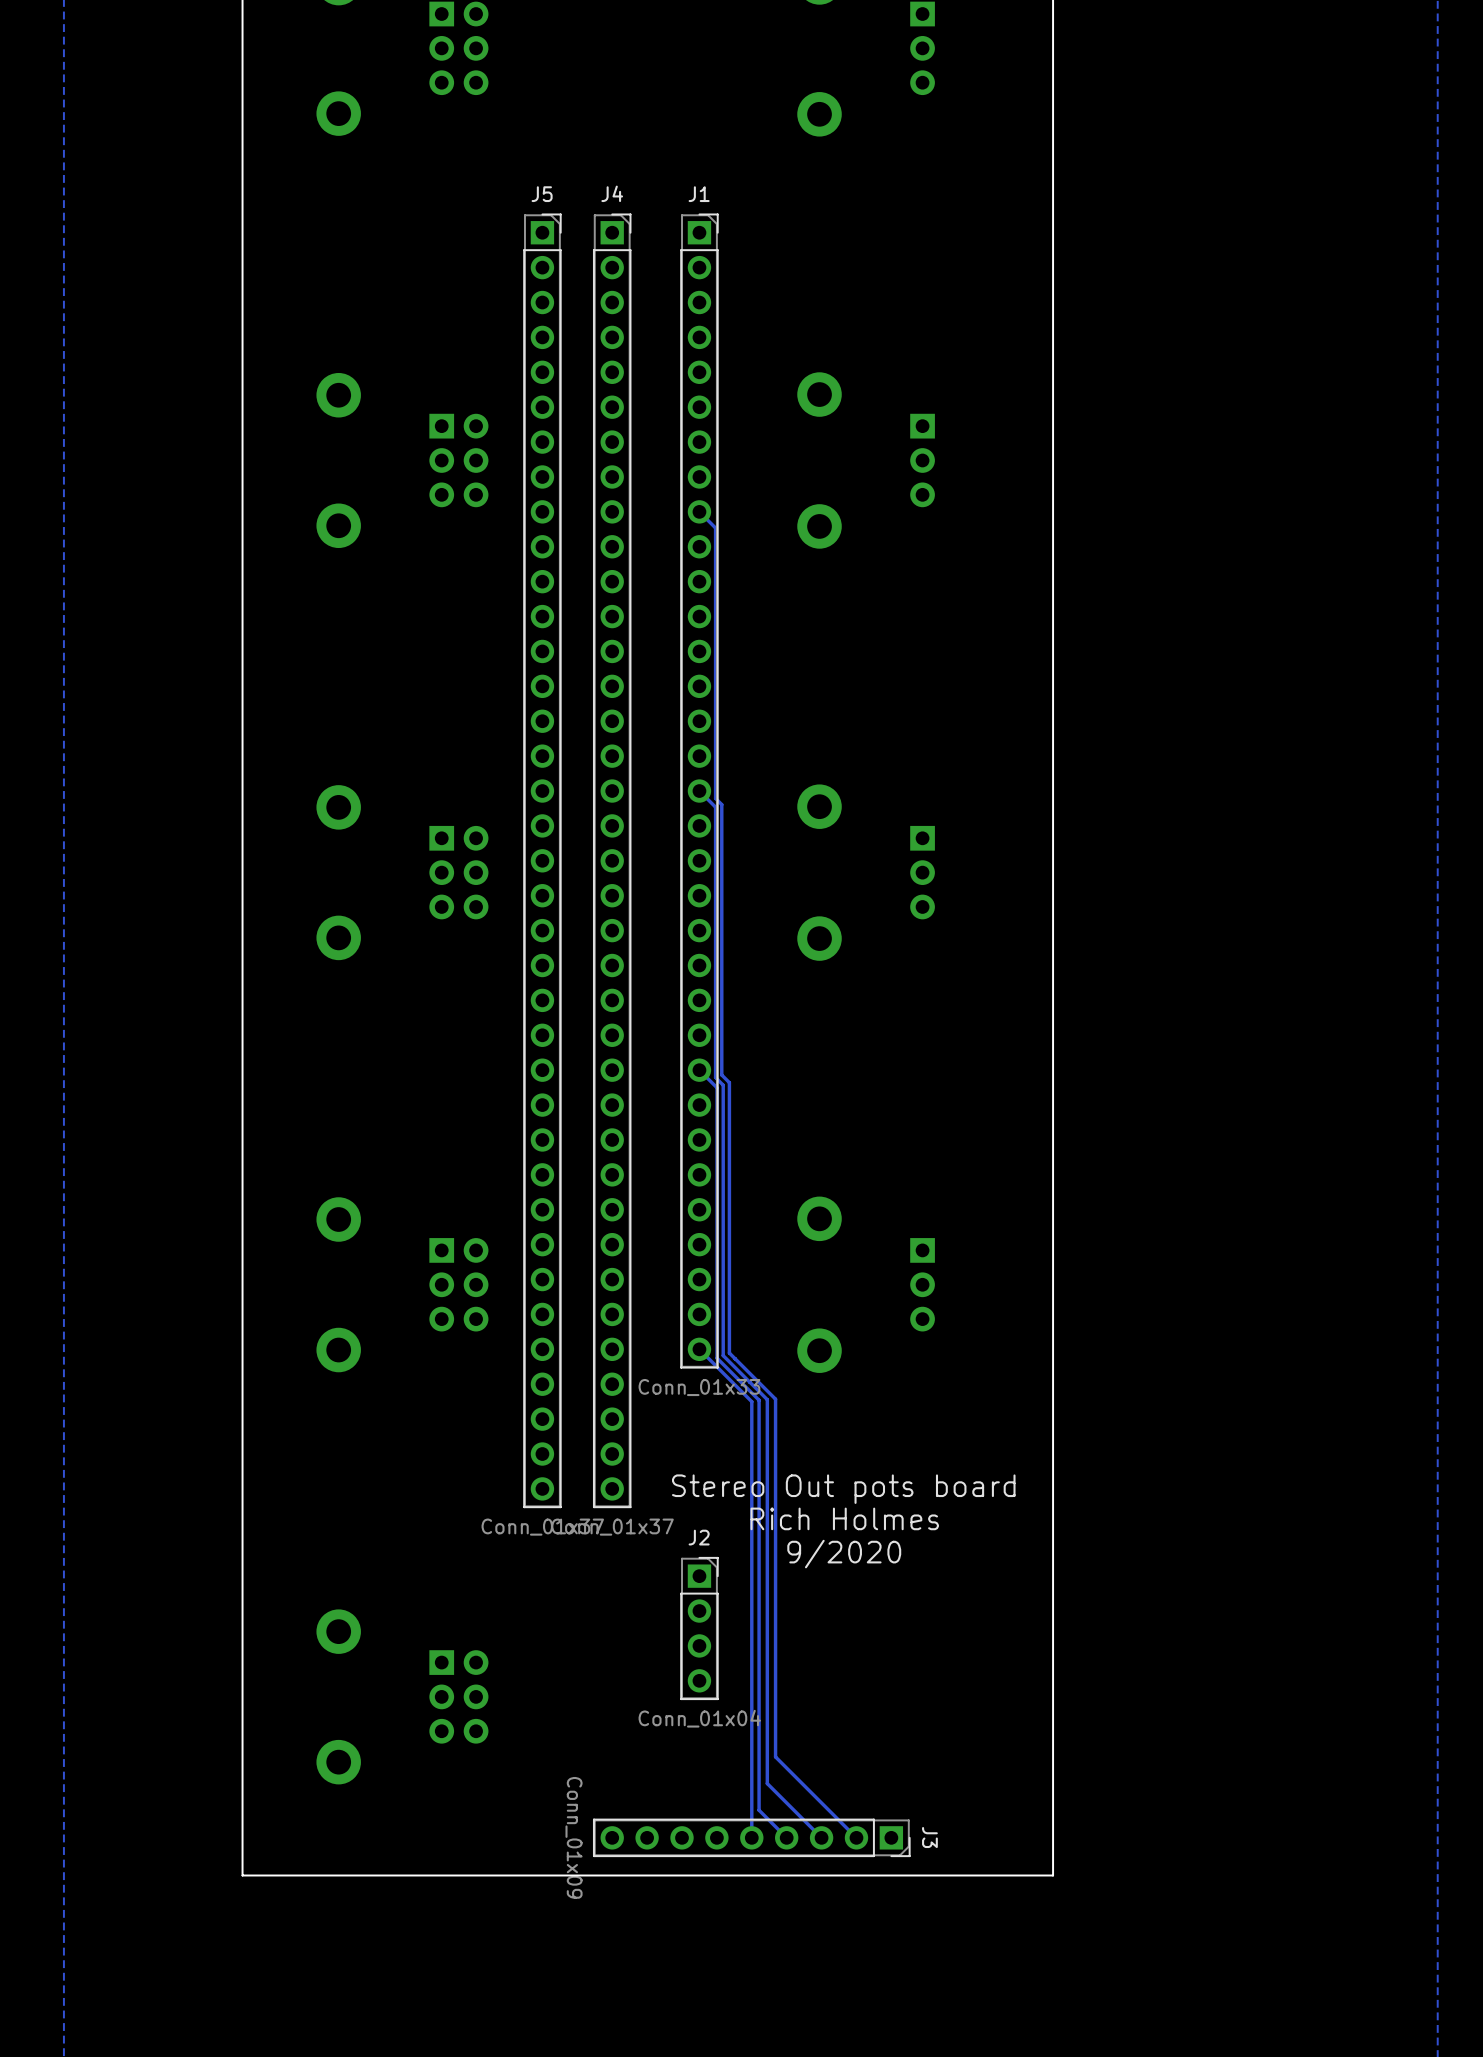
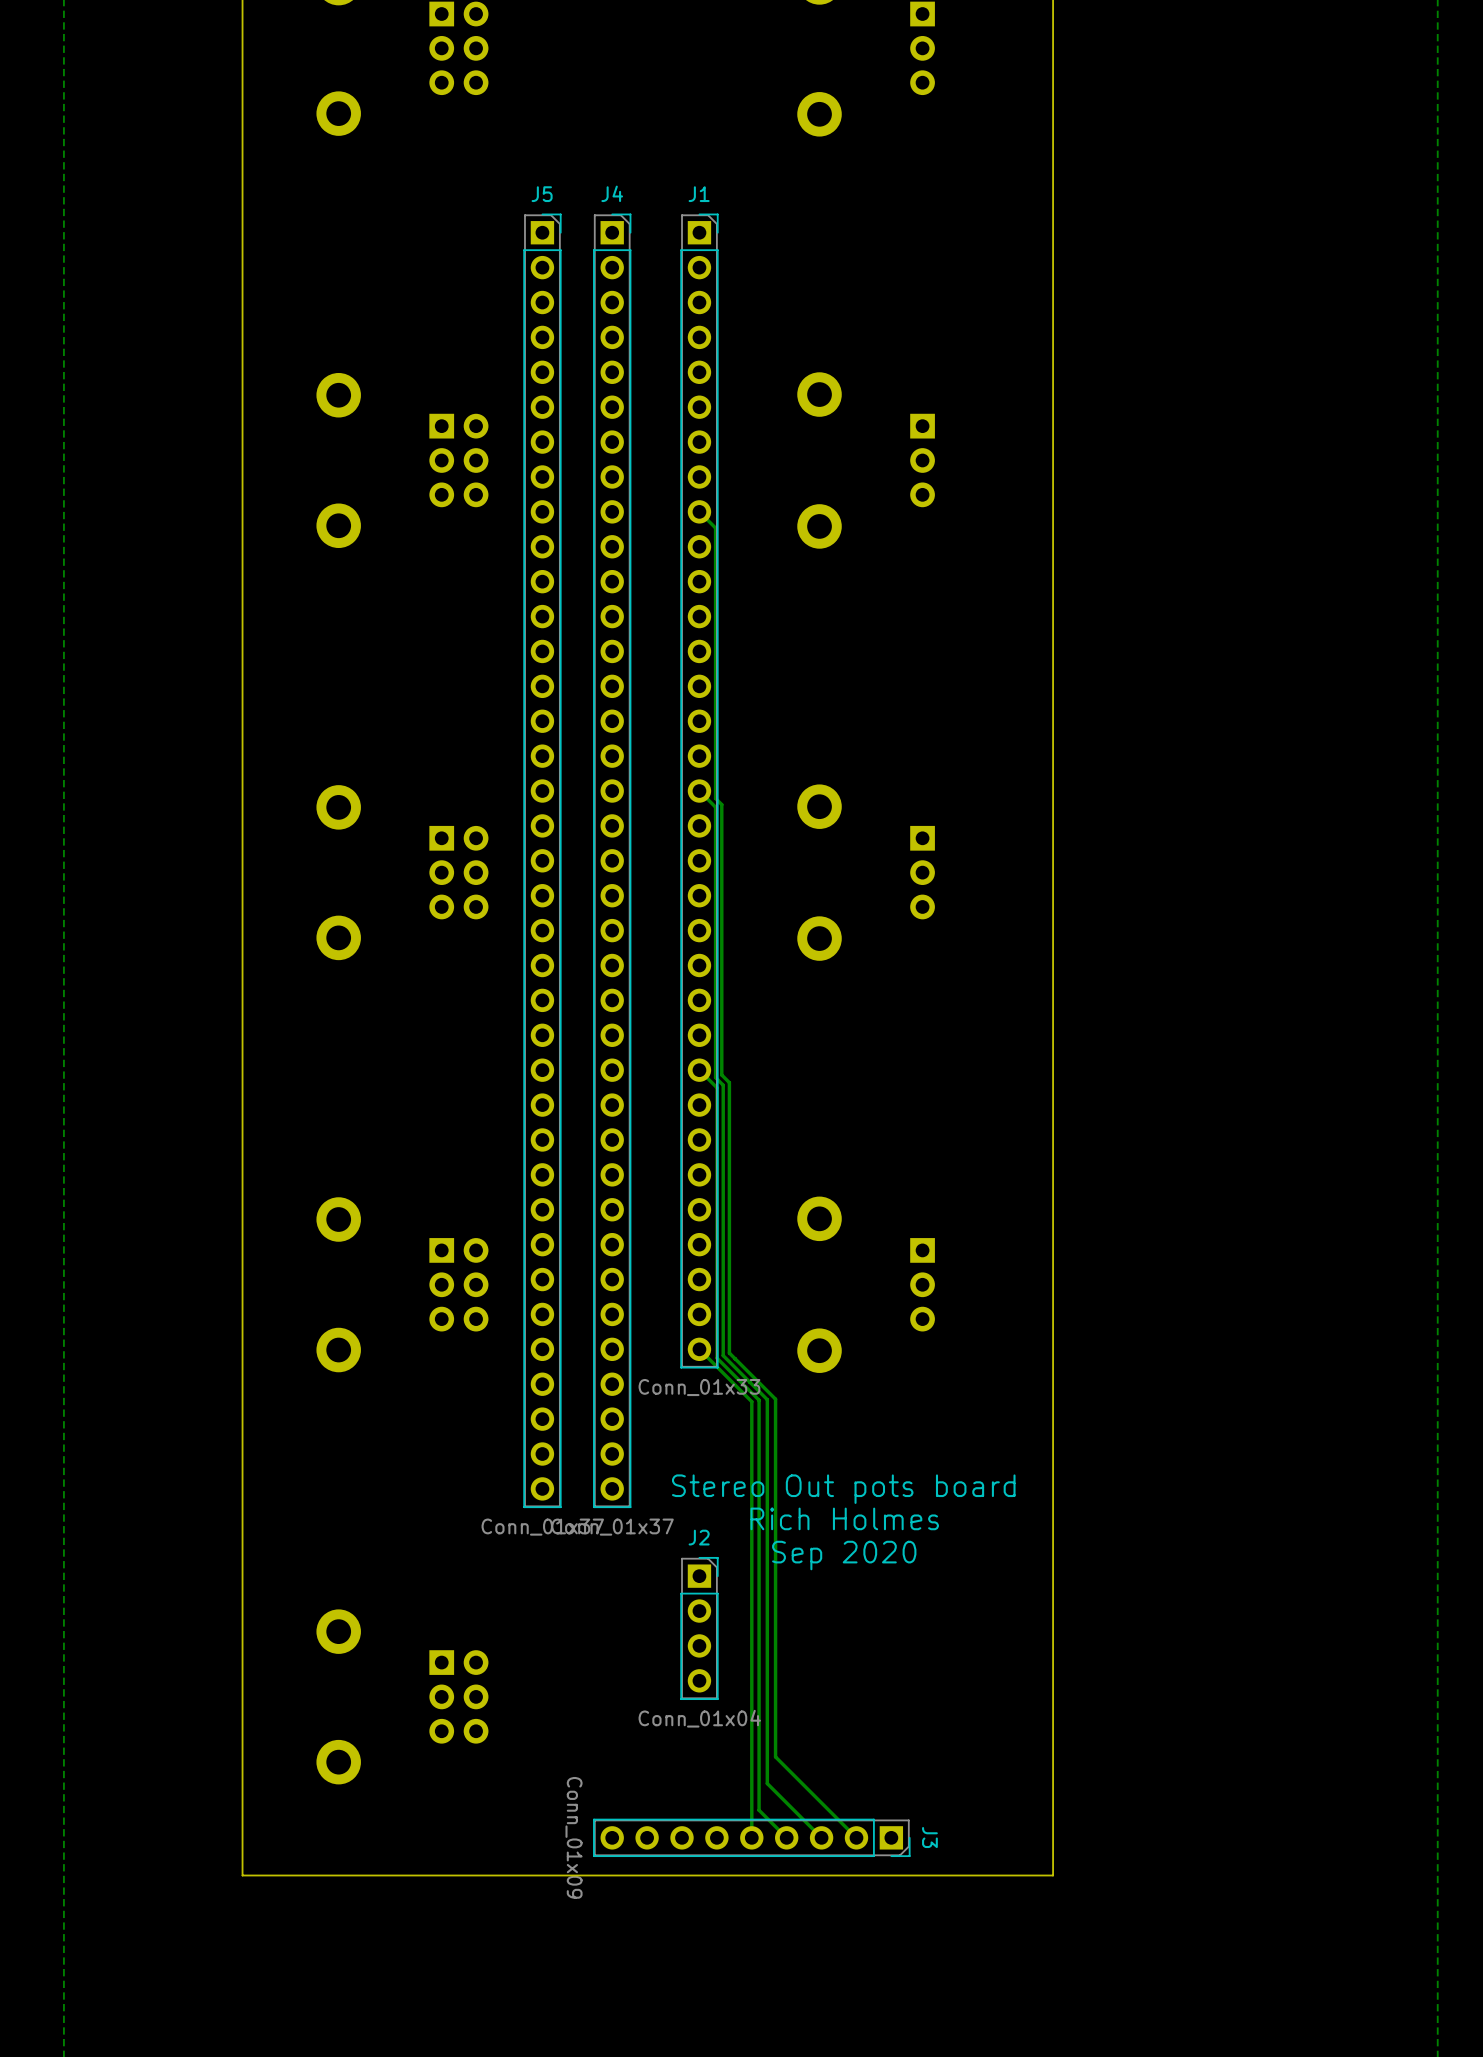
text: 9/2020 (844, 1554) -> Sep 2020 (844, 1555)

